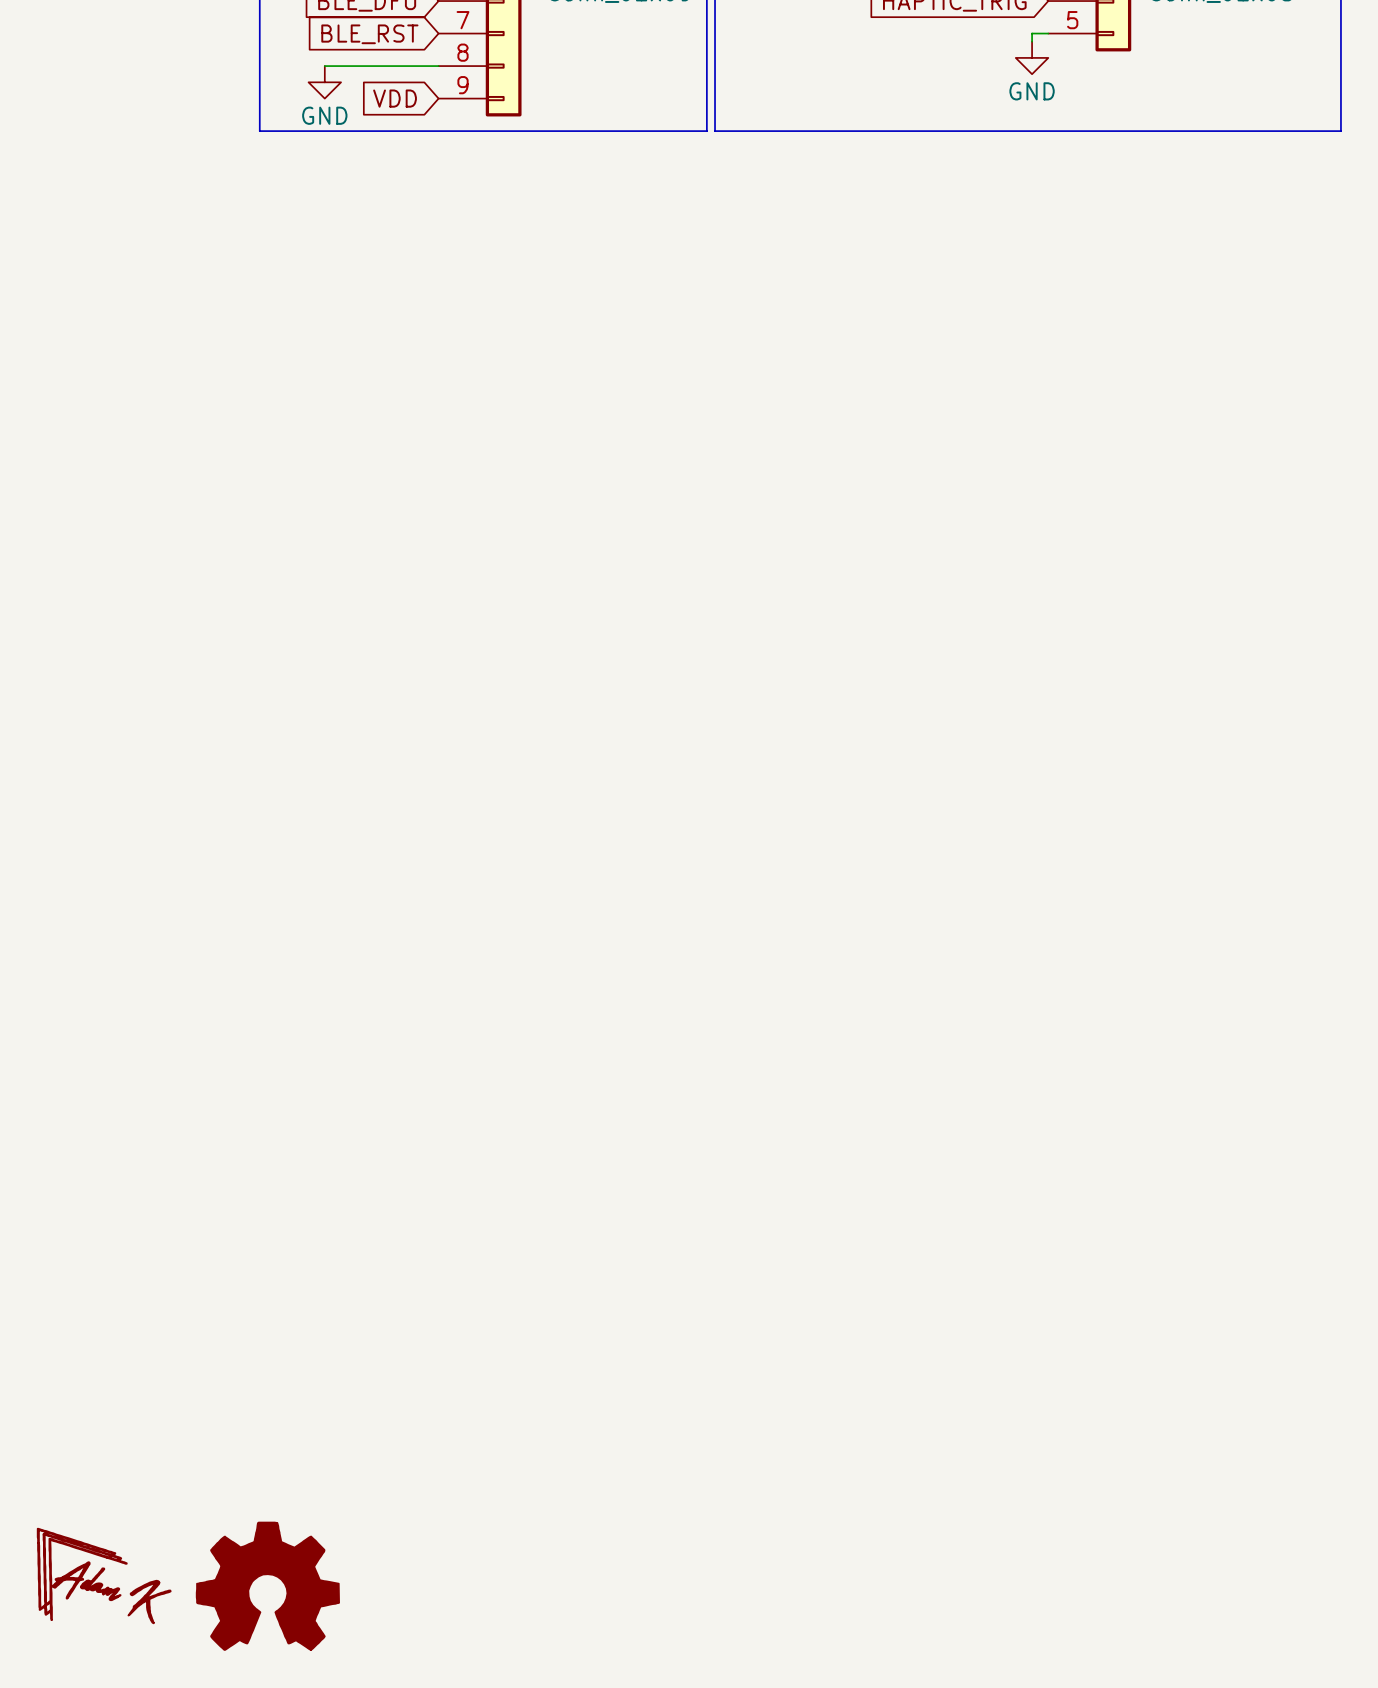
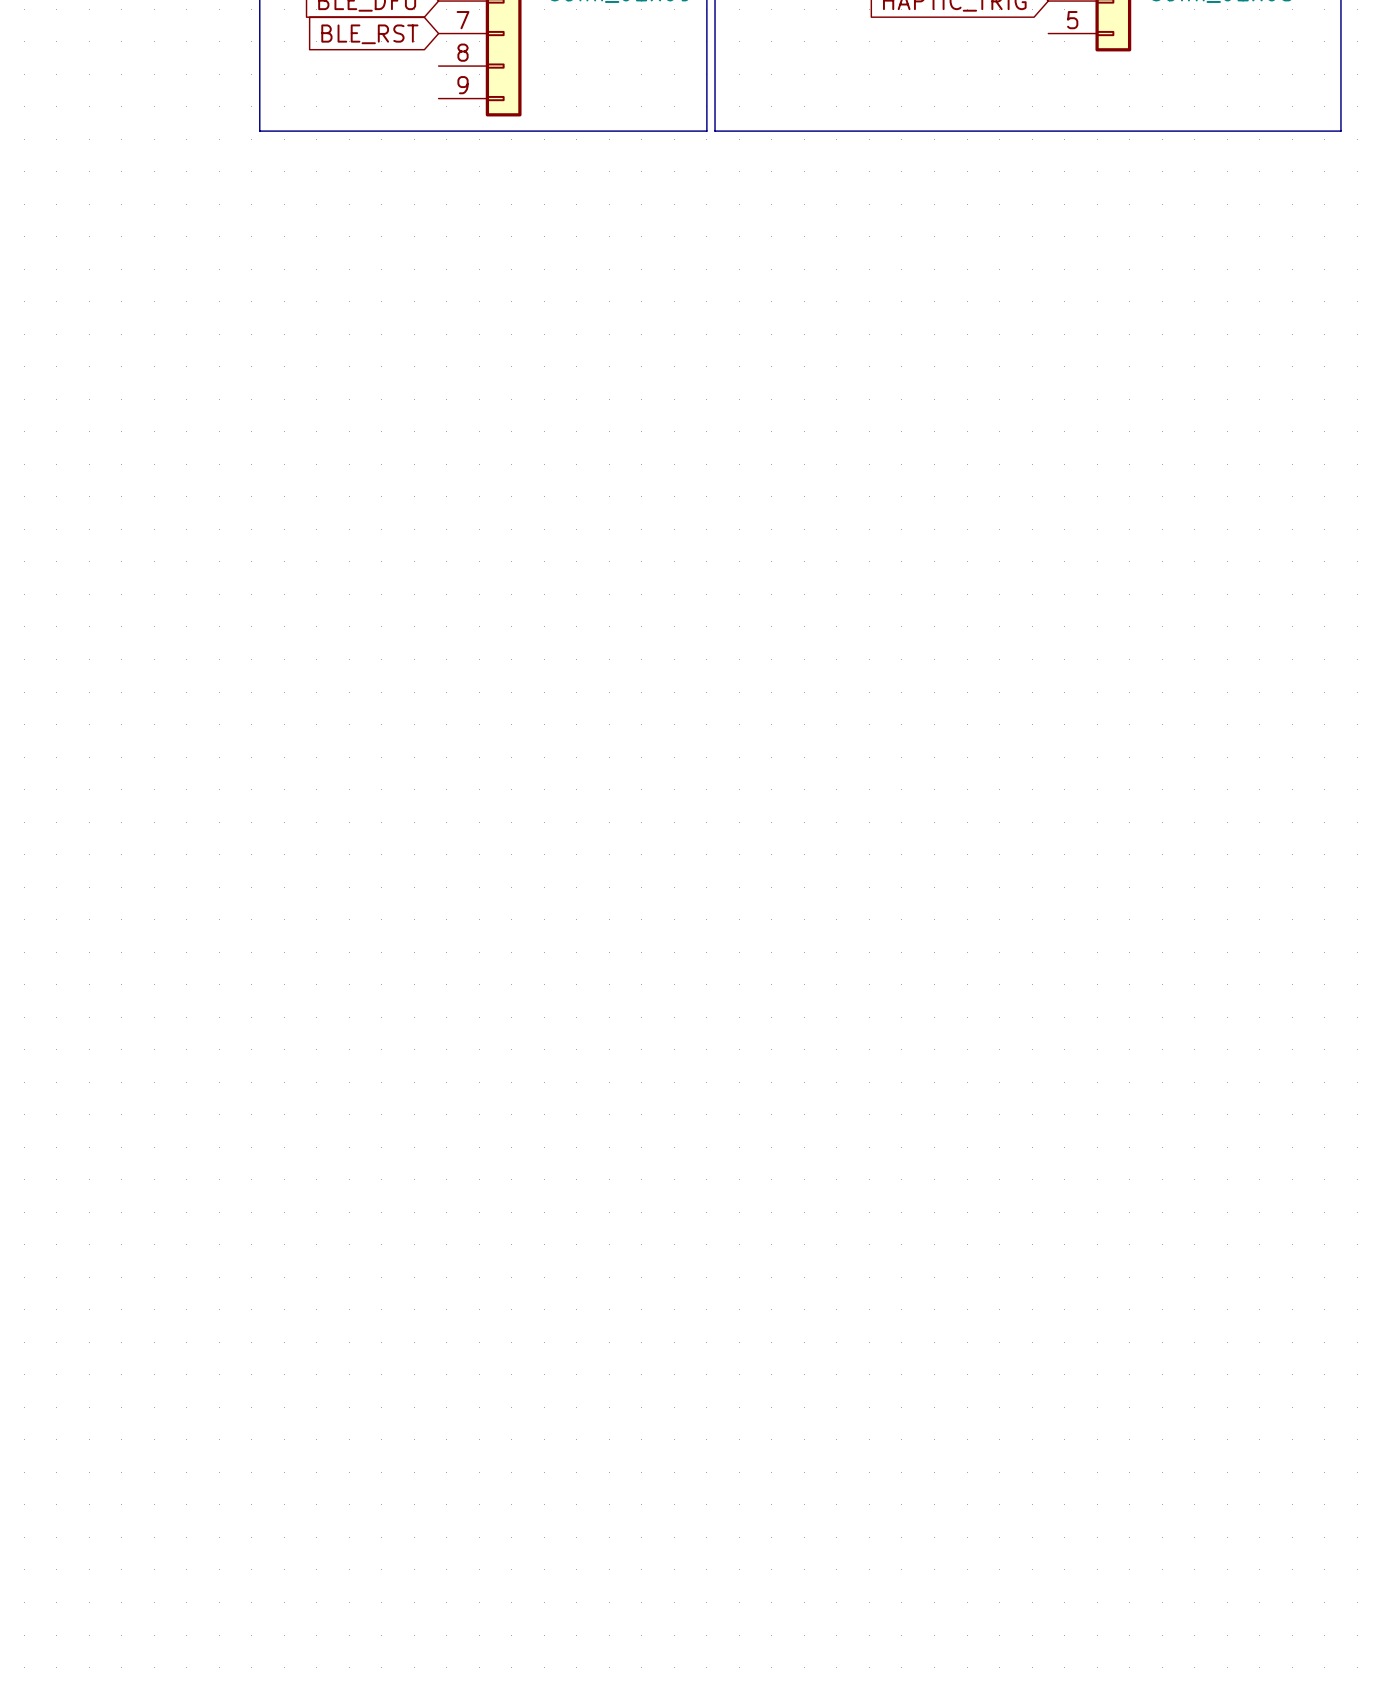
wire: (1048, 33) (1032, 33) (1032, 41) -> none
power symbol: GND (1032, 57) -> none
wire: (324, 66) (438, 66) -> none
power symbol: GND (324, 82) -> none
global label: VDD (395, 98) -> none
power symbol: (104, 1576) -> none
power symbol: (267, 1586) -> none

